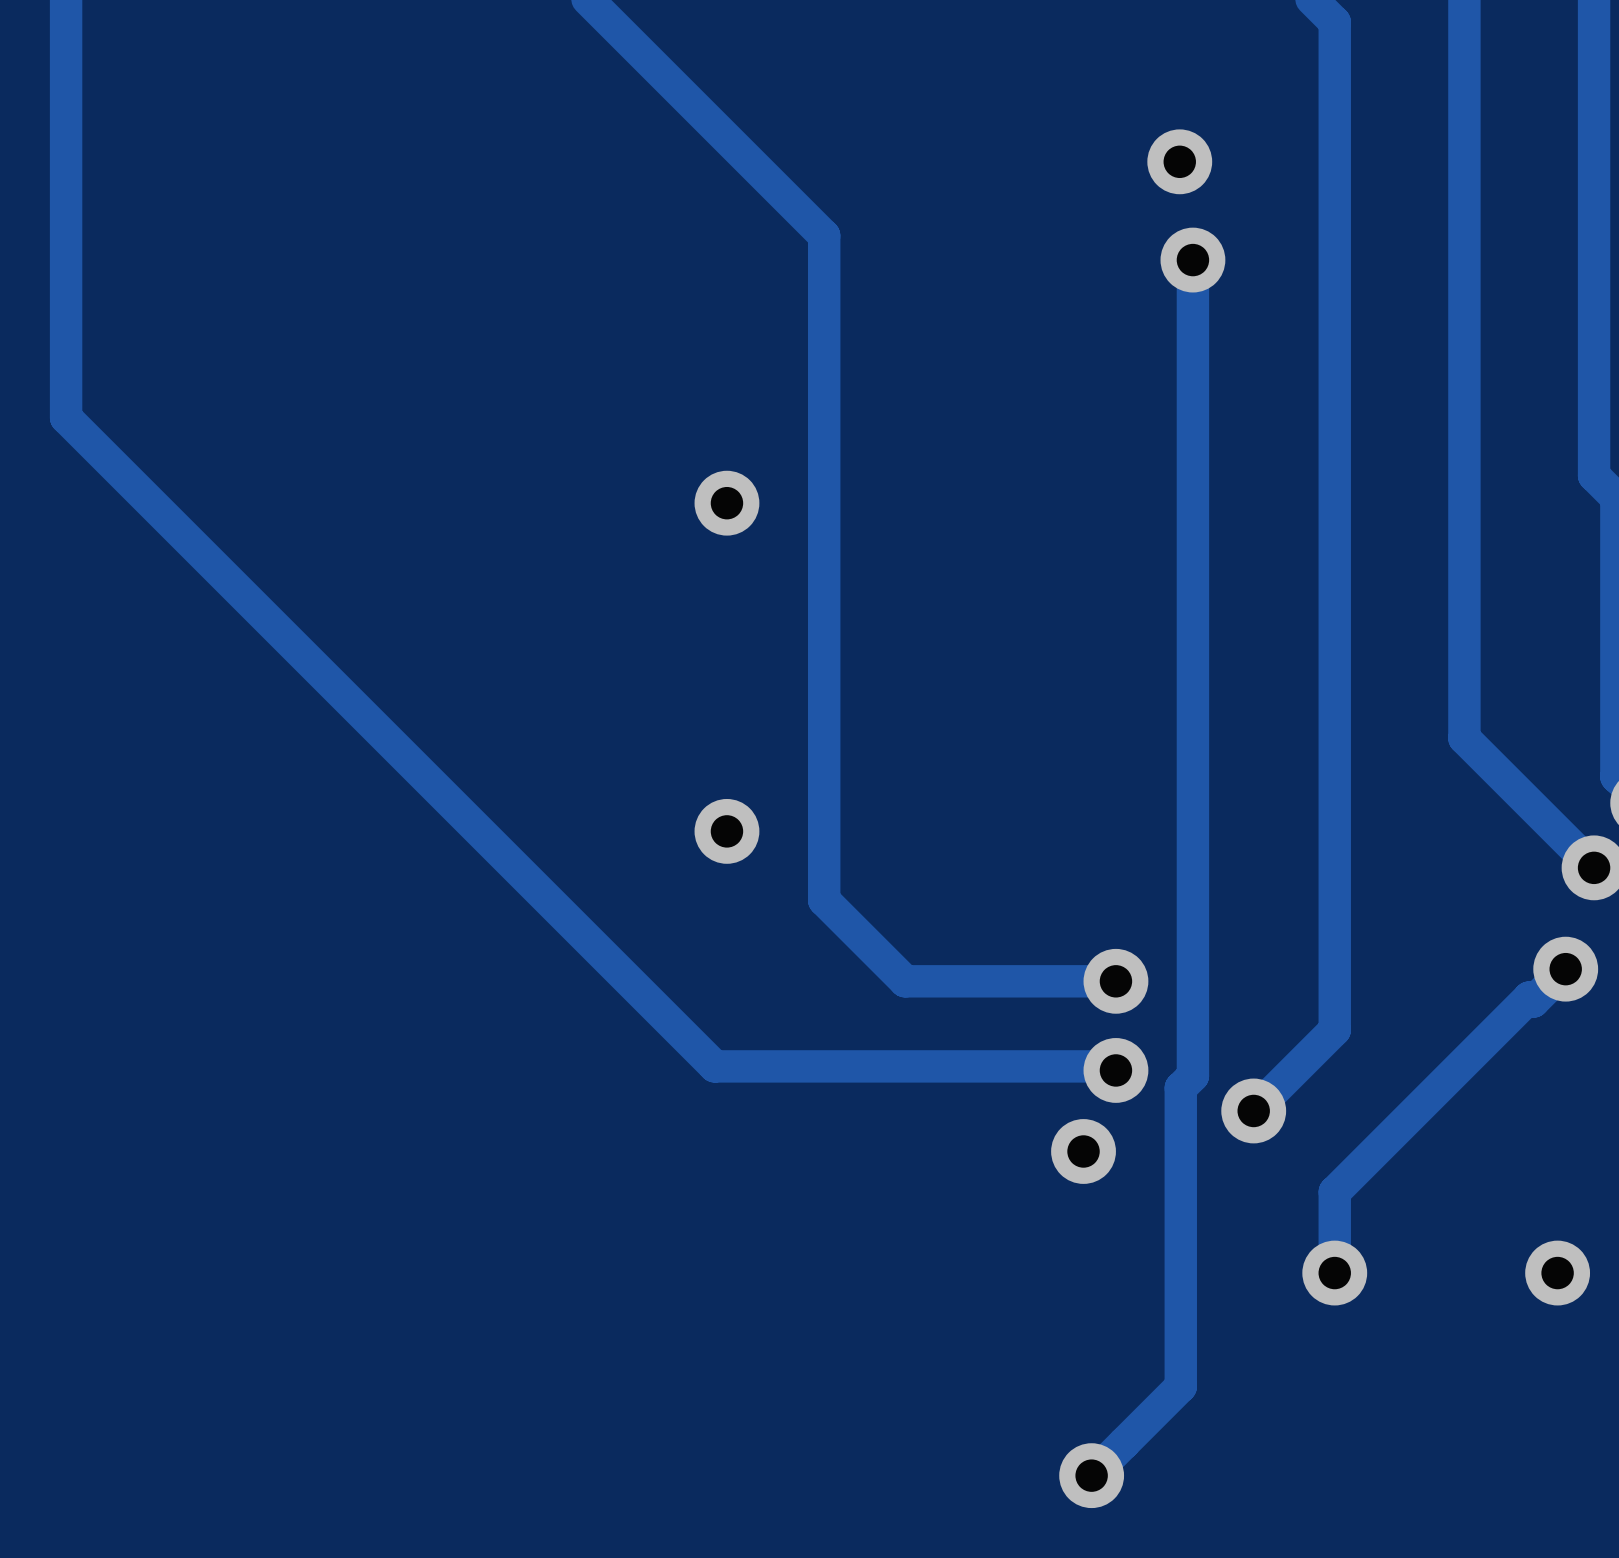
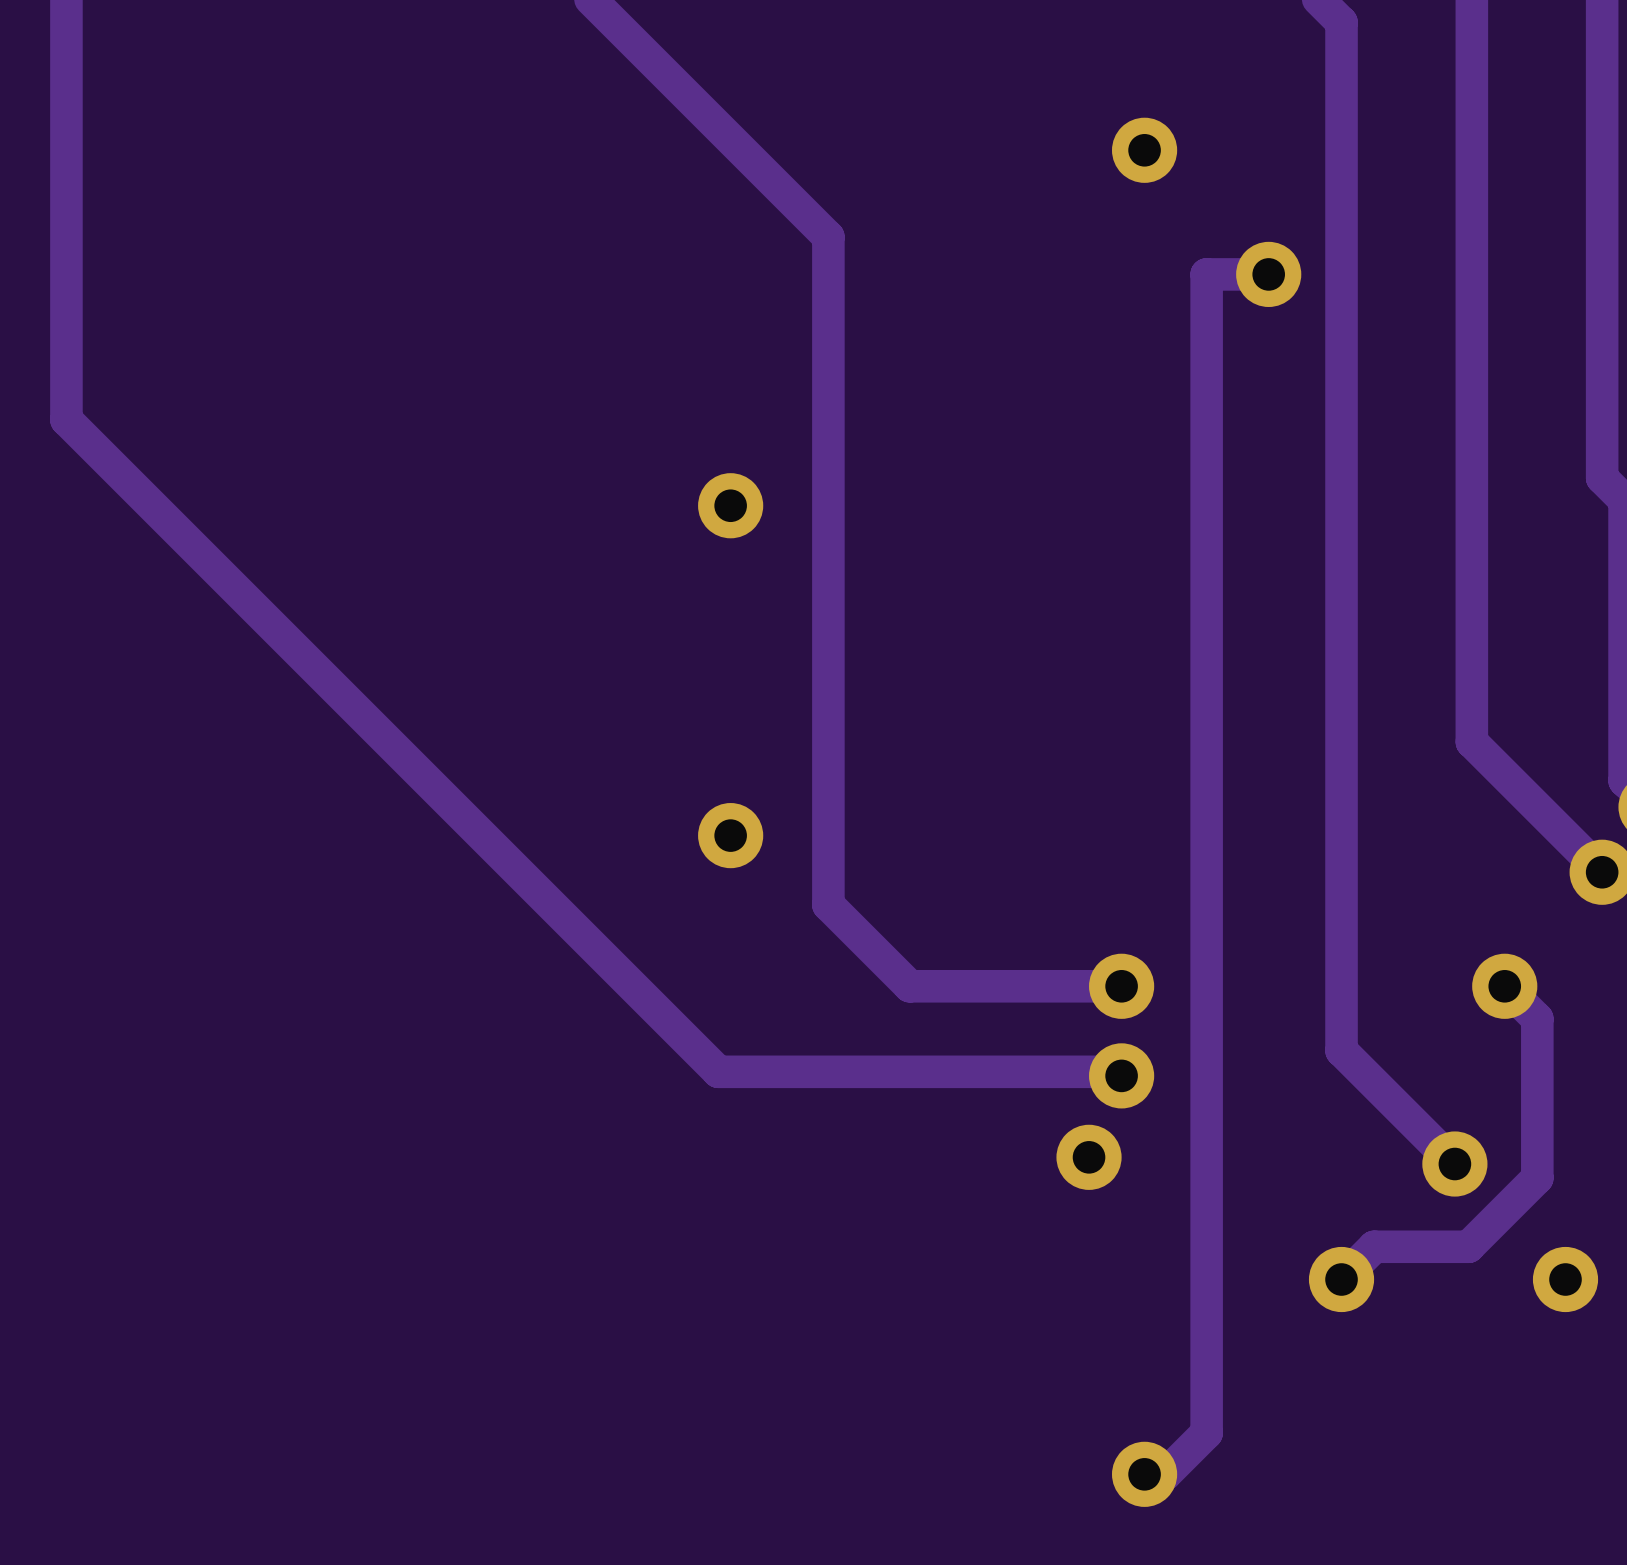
via position: (1179, 161) -> (1144, 150)
track: (1192, 260) (1192, 1075) (1180, 1087) (1180, 1386) (1091, 1475) -> none
via: (1192, 260) -> none
track: none -> (1268, 274) (1206, 274) (1206, 1432) (1165, 1474) (1144, 1474)
via: none -> (1268, 274)
track: (1565, 969) (1533, 1001) (1529, 997) (1334, 1192) (1334, 1273) -> (1504, 986) (1537, 1018) (1537, 1178) (1468, 1246) (1374, 1246) (1341, 1279)
via position: (1565, 969) -> (1504, 986)
track: (1334, 1029) (1253, 1110) -> (1341, 1035) (1341, 1050) (1454, 1164)
via: (1253, 1110) -> none
via: none -> (1454, 1164)
via position: (1091, 1475) -> (1144, 1474)

